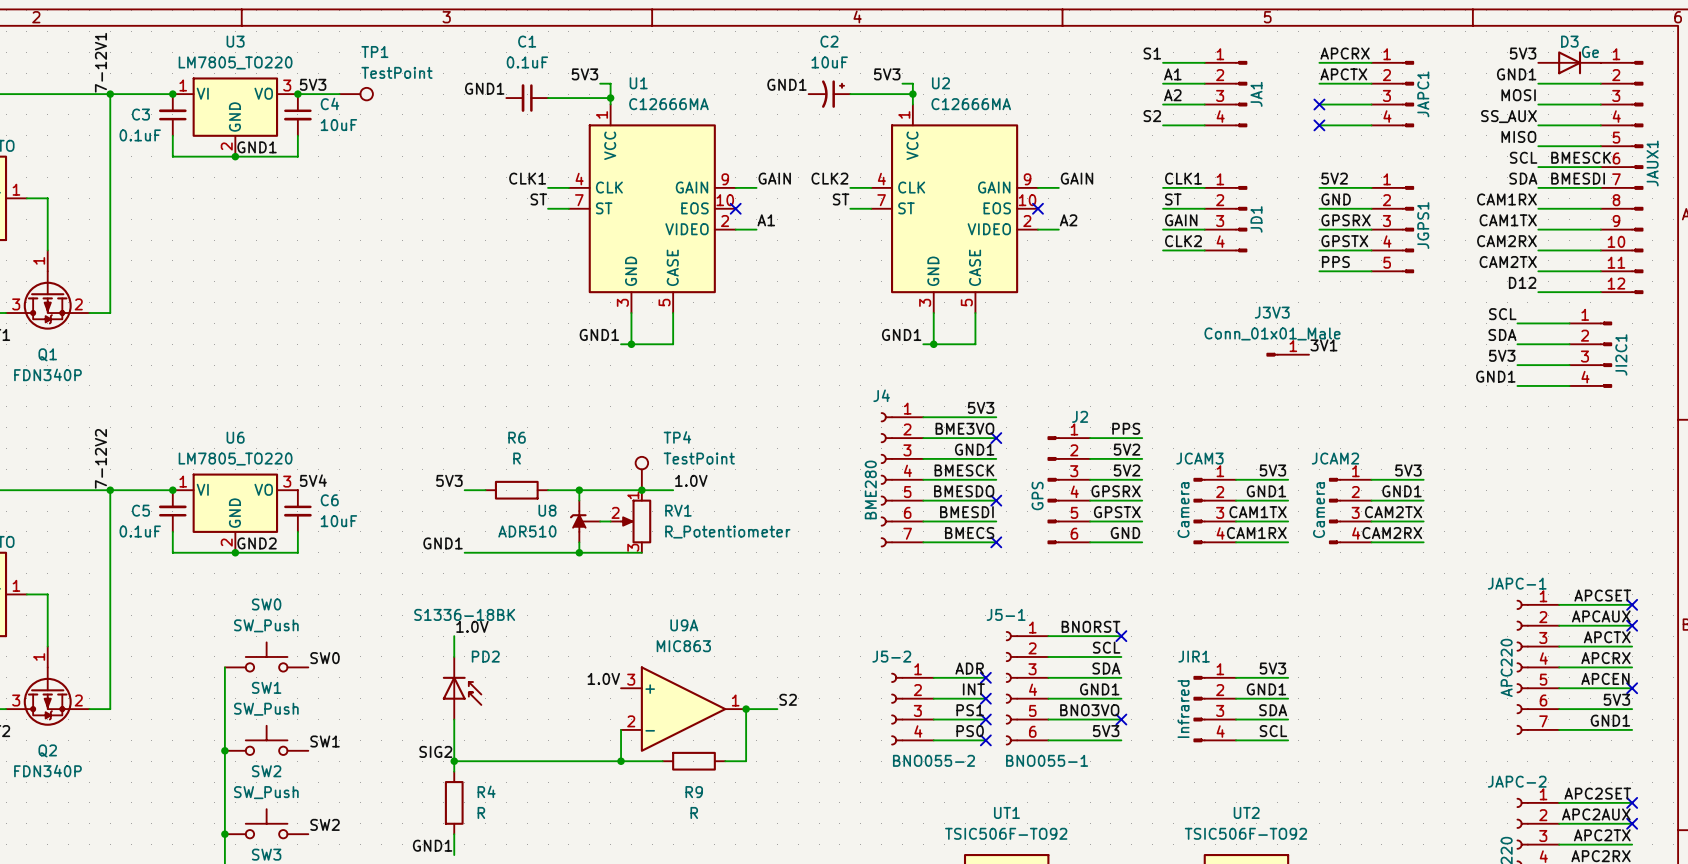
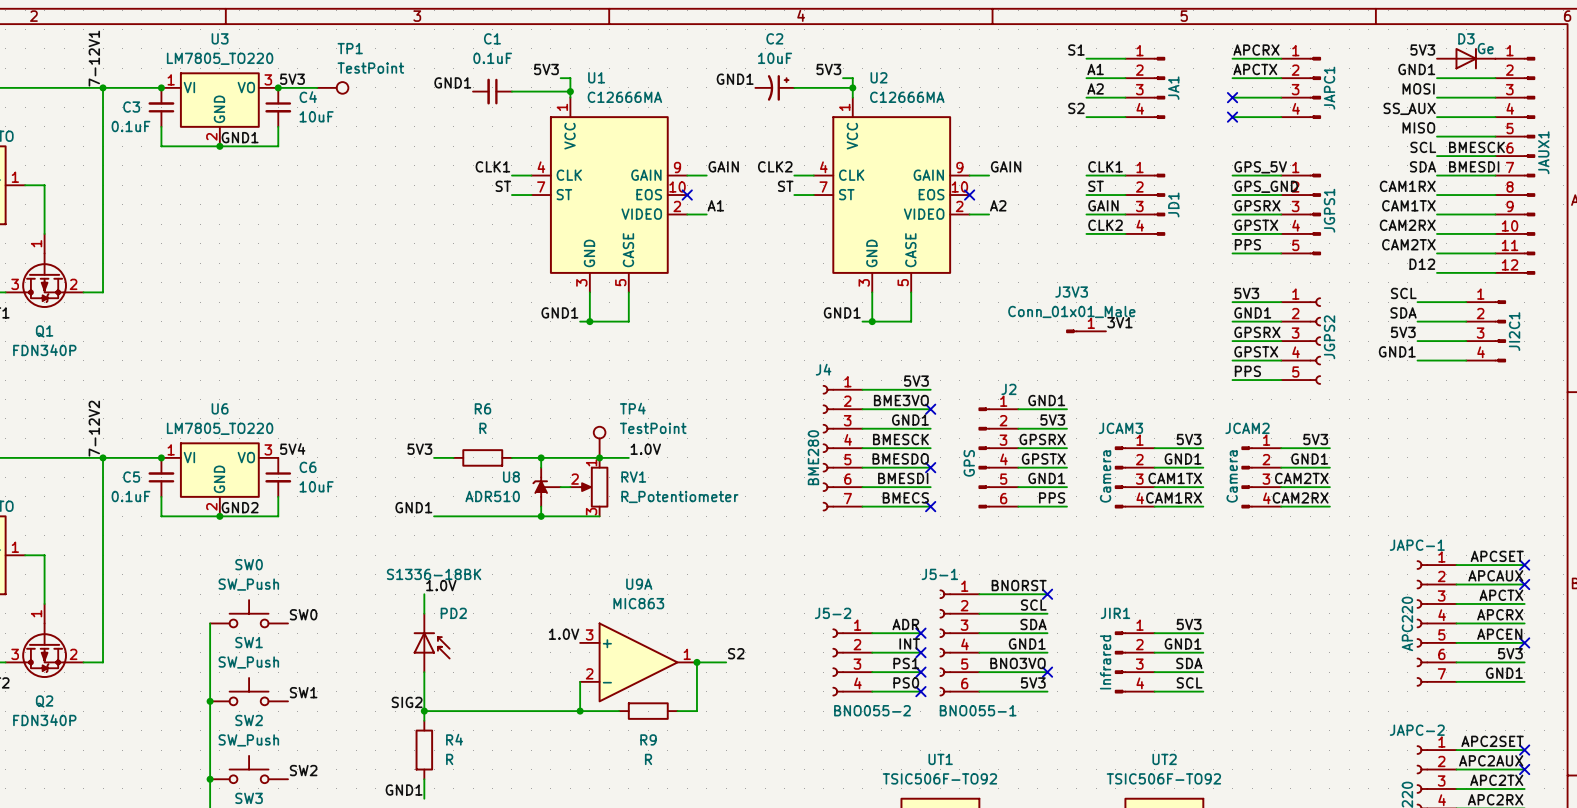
label: 5V2 (1334, 178) -> GPS_5V (1260, 167)
label: GND (1336, 199) -> GPS_GND (1266, 186)
label: none -> 5V3 (1246, 293)
wire: none -> (1232, 302) (1281, 302)
label: none -> GND1 (1252, 312)
wire: none -> (1232, 321) (1281, 321)
label position: 3V1 (1323, 345) -> 3V1 (1119, 322)
J3V3 position: (1287, 354) -> (1086, 331)
label: none -> GPSRX (1257, 332)
wire: none -> (1232, 341) (1281, 341)
JGPS2: none -> (1300, 341)
label: none -> GPSTX (1256, 351)
wire: none -> (1232, 360) (1281, 360)
label: none -> PPS (1247, 371)
wire: none -> (1232, 380) (1281, 380)
label: PPS (1126, 428) -> GND1 (1046, 400)
label: 5V2 (1126, 449) -> 5V3 (1052, 420)
label: 5V2 (1126, 470) -> GPSRX (1042, 439)
label: GPSRX (1116, 491) -> GPSTX (1043, 458)
label: GPSTX (1117, 512) -> GND1 (1046, 478)
label: GND (1125, 533) -> PPS (1052, 497)

